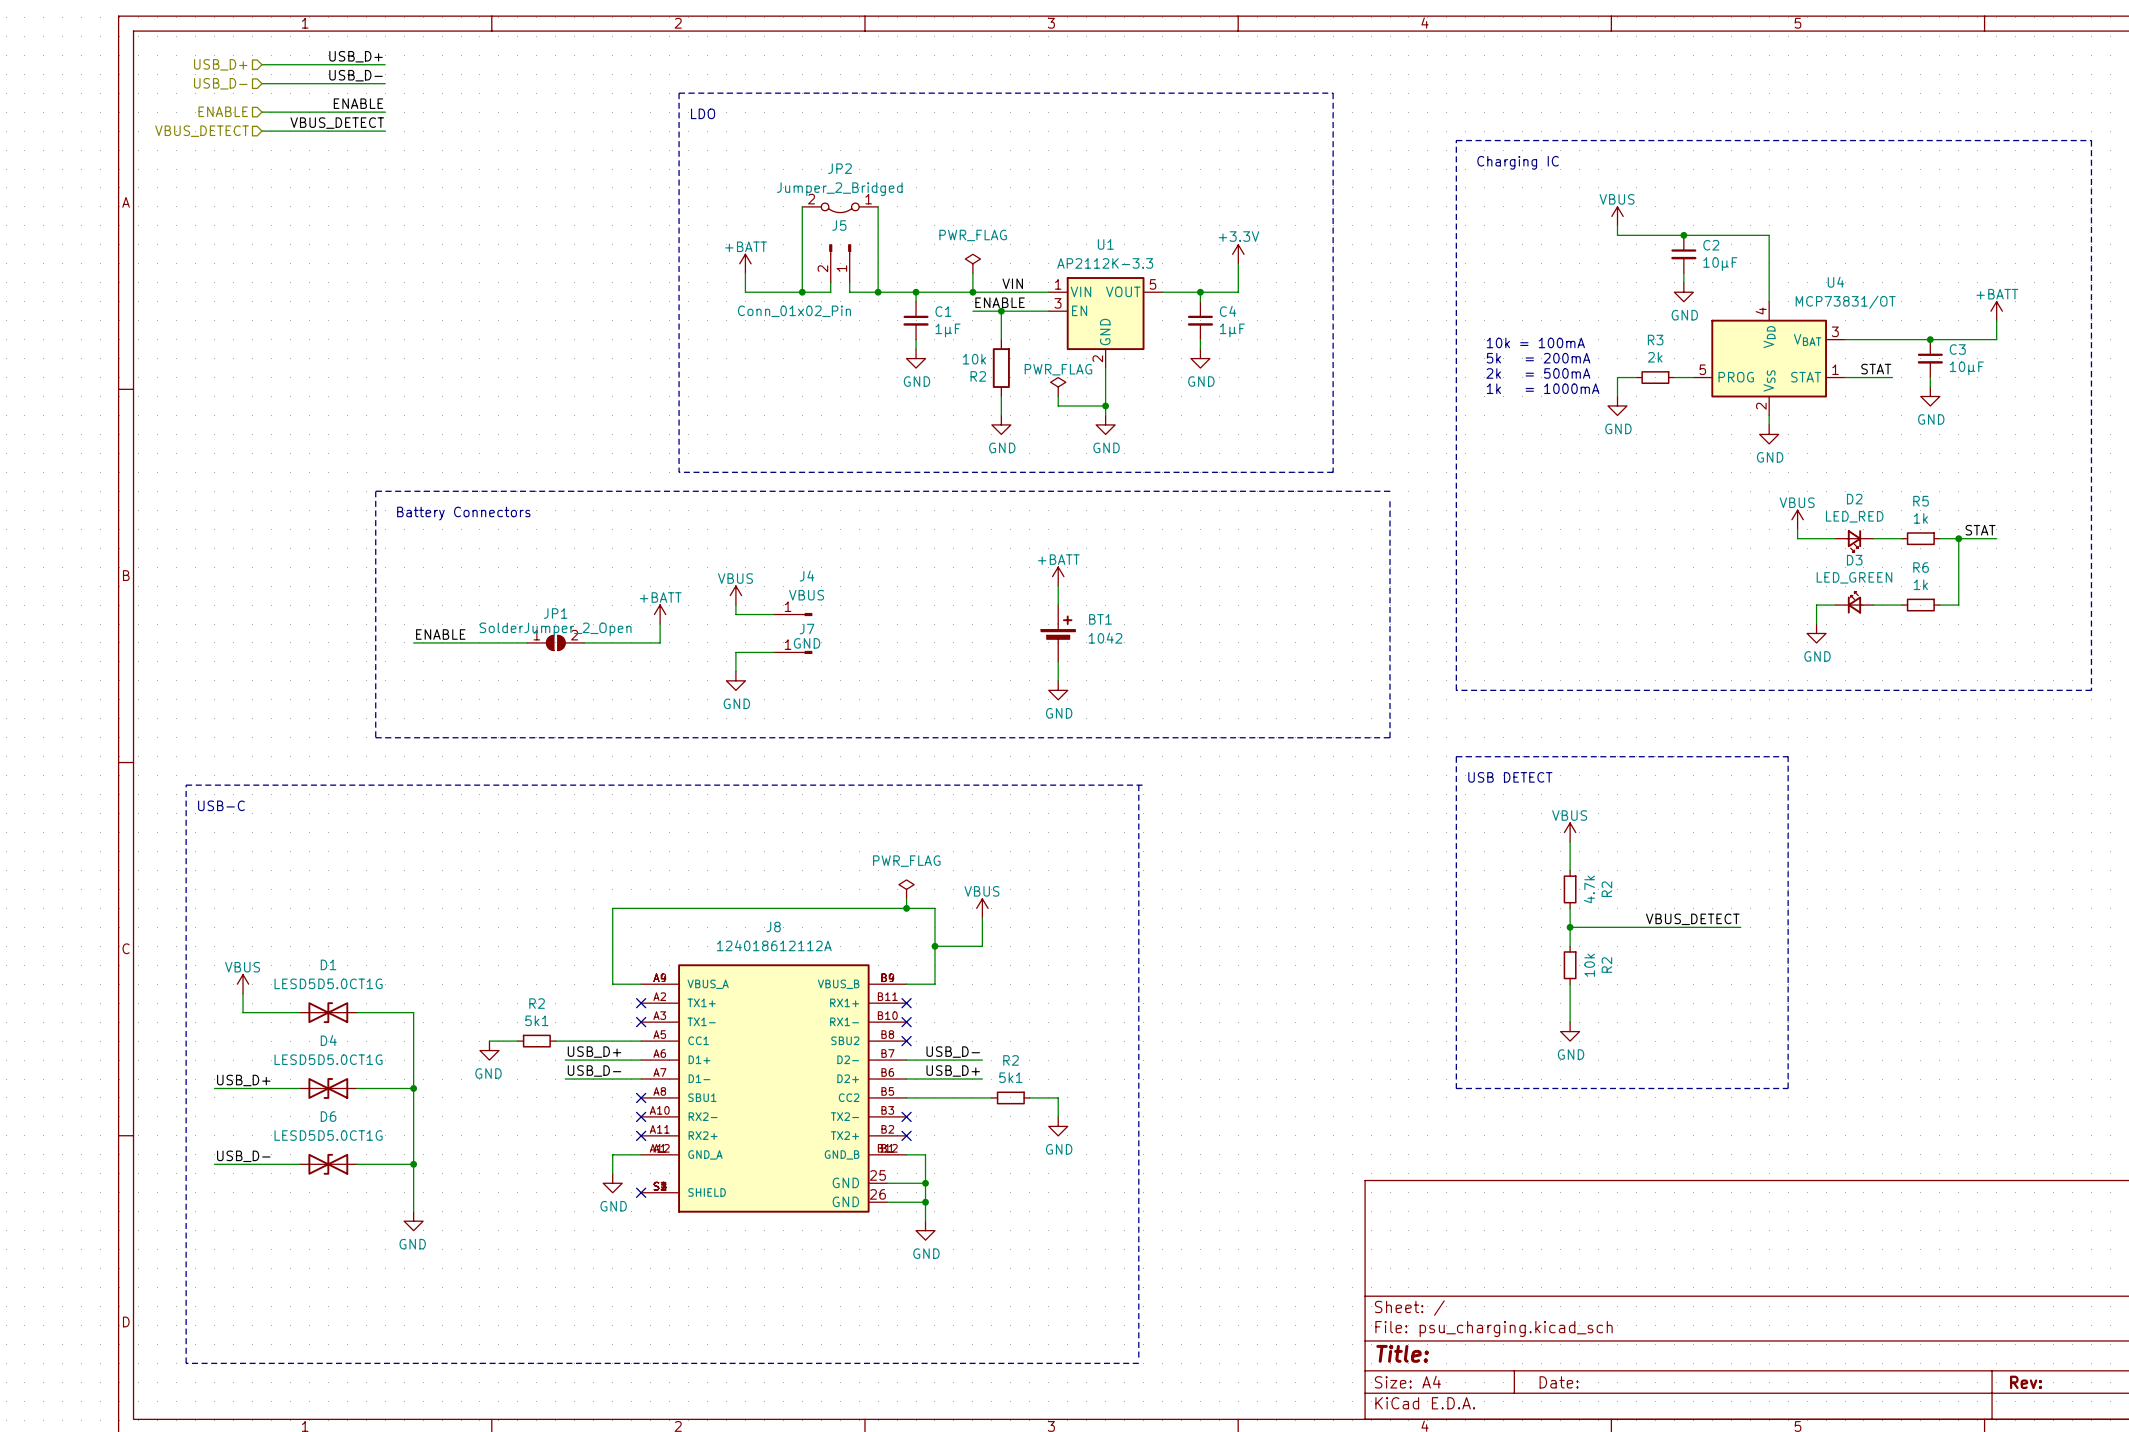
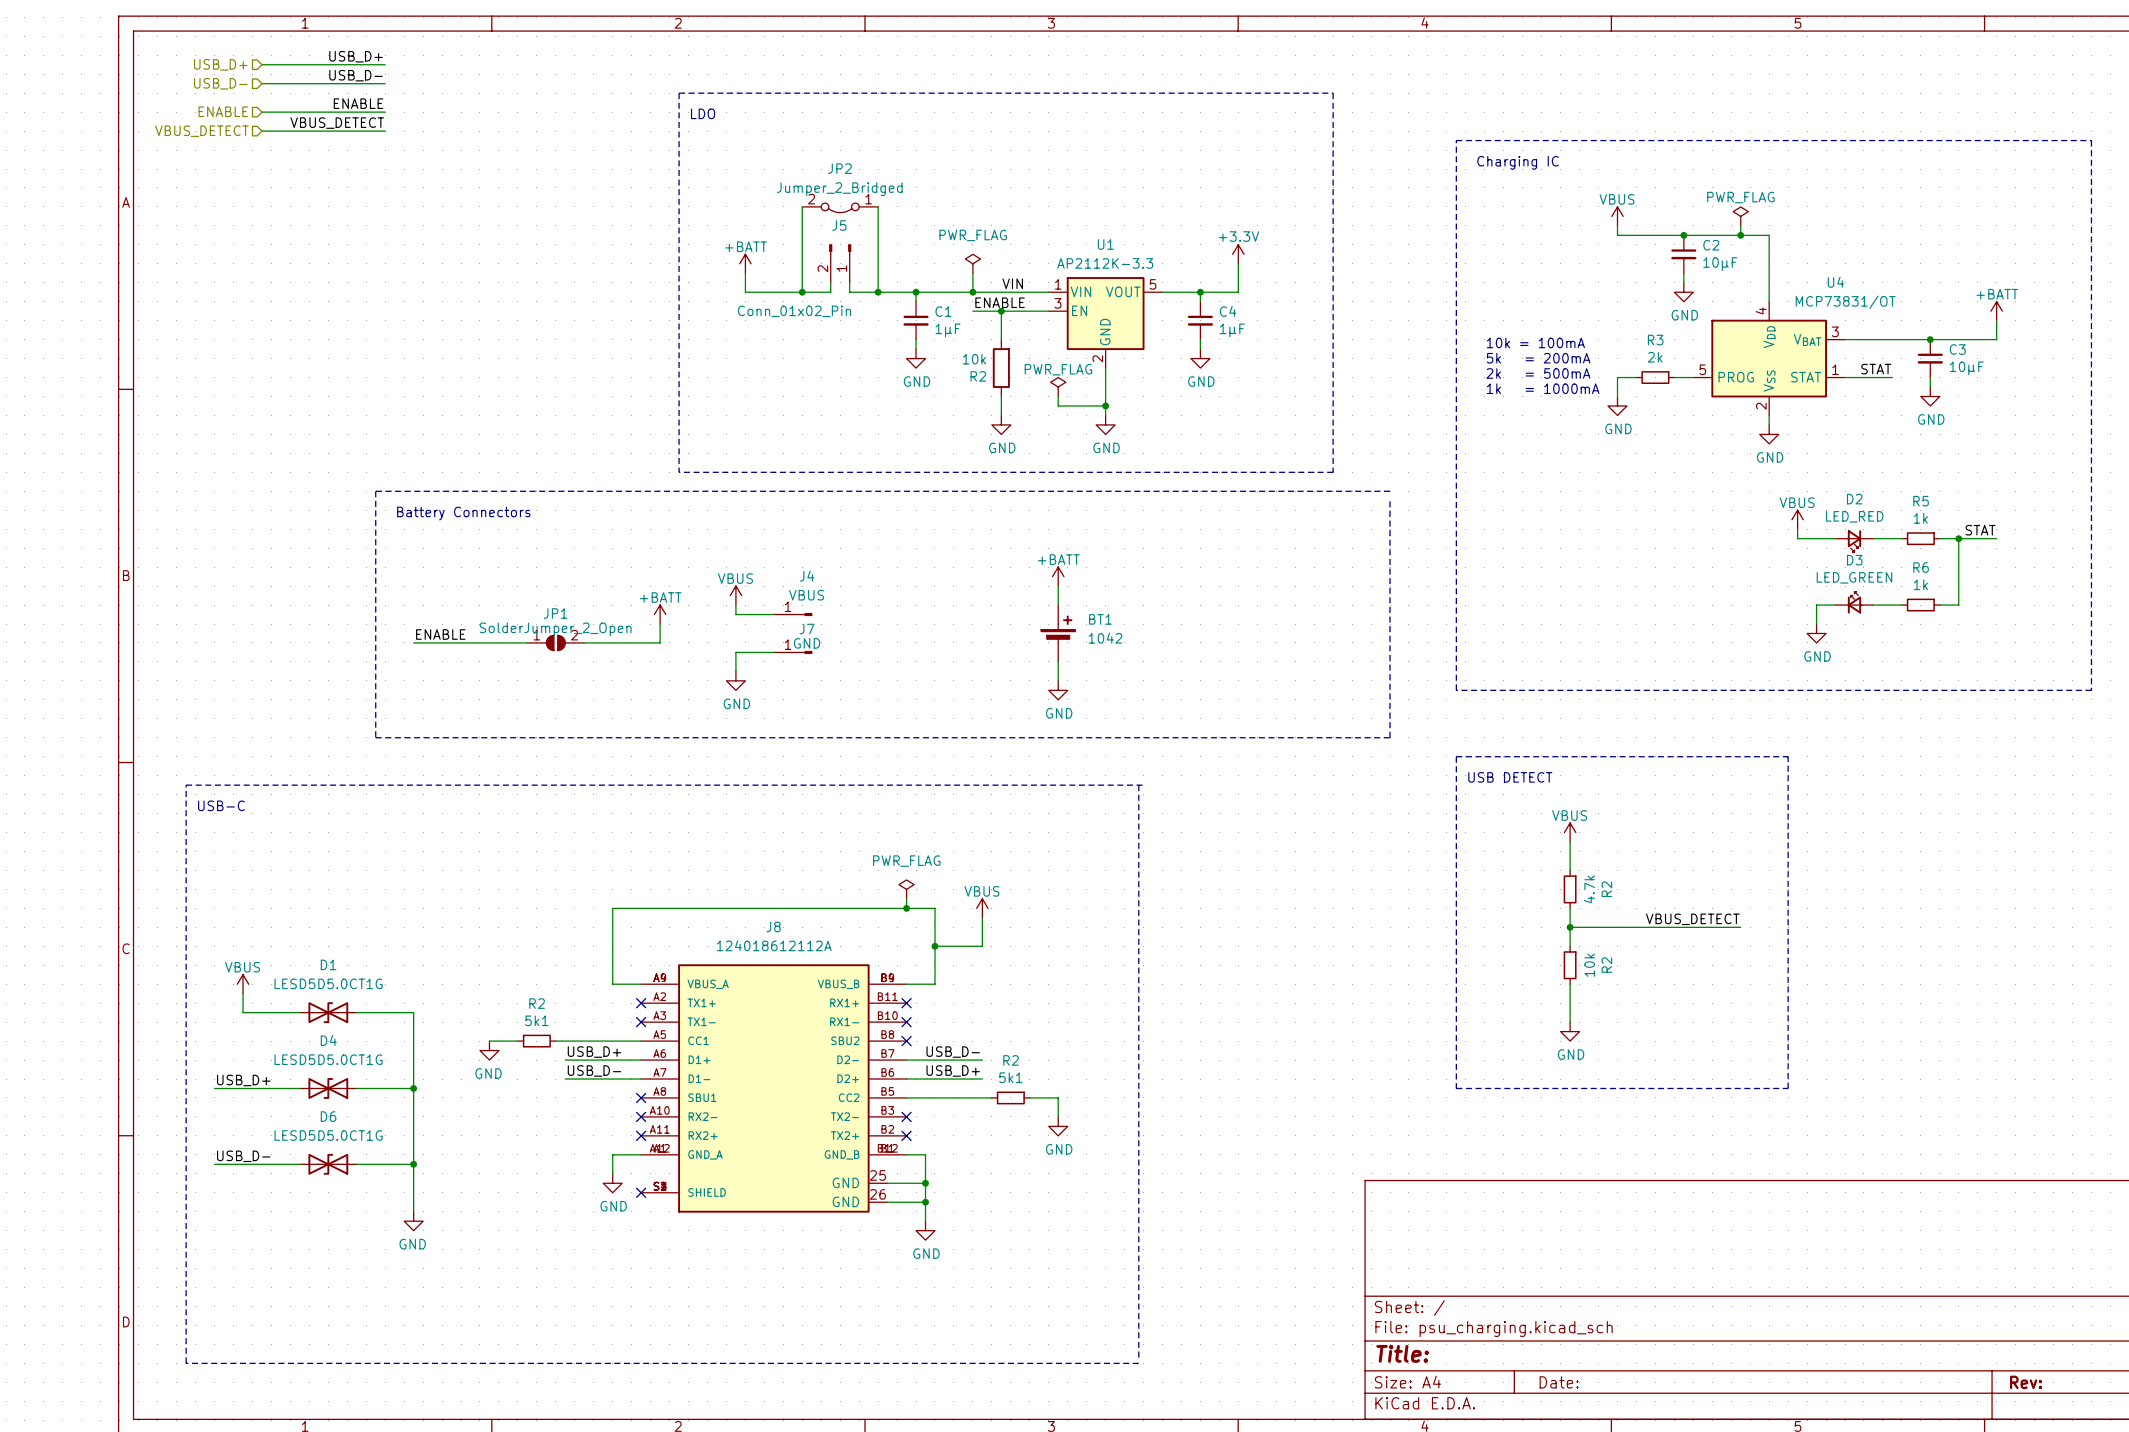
power symbol: none -> PWR_FLAG (1740, 216)
wire: none -> (1740, 225) (1740, 235)
junction: none -> (1740, 235)

